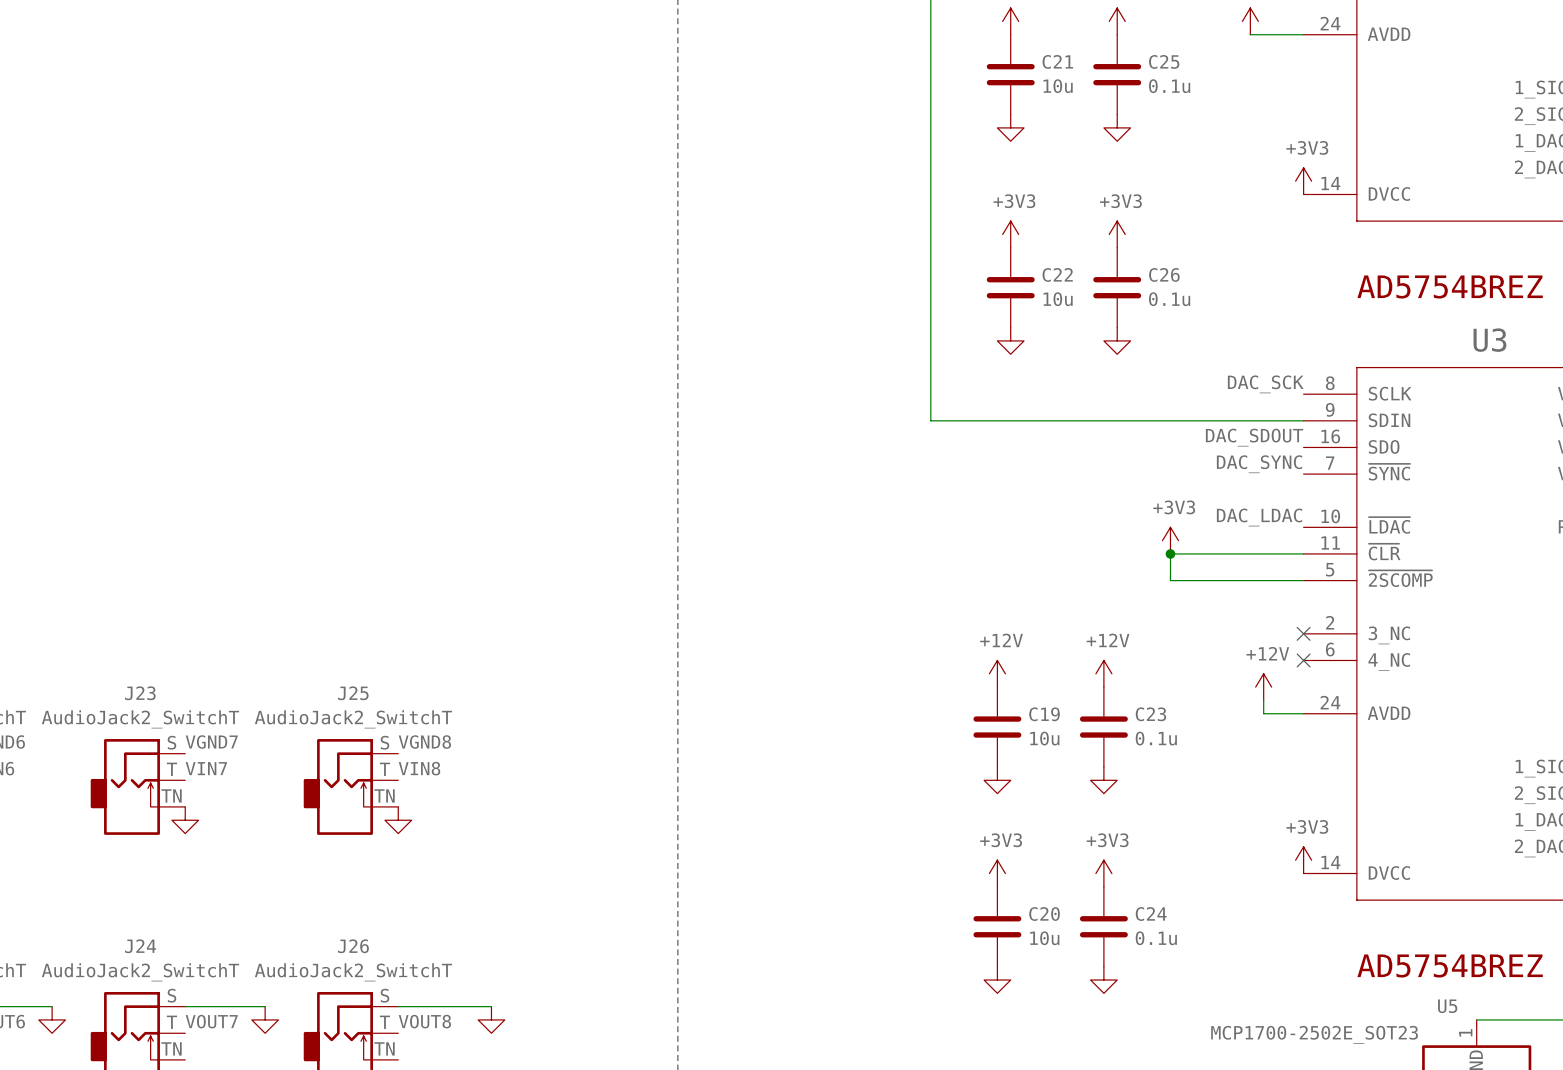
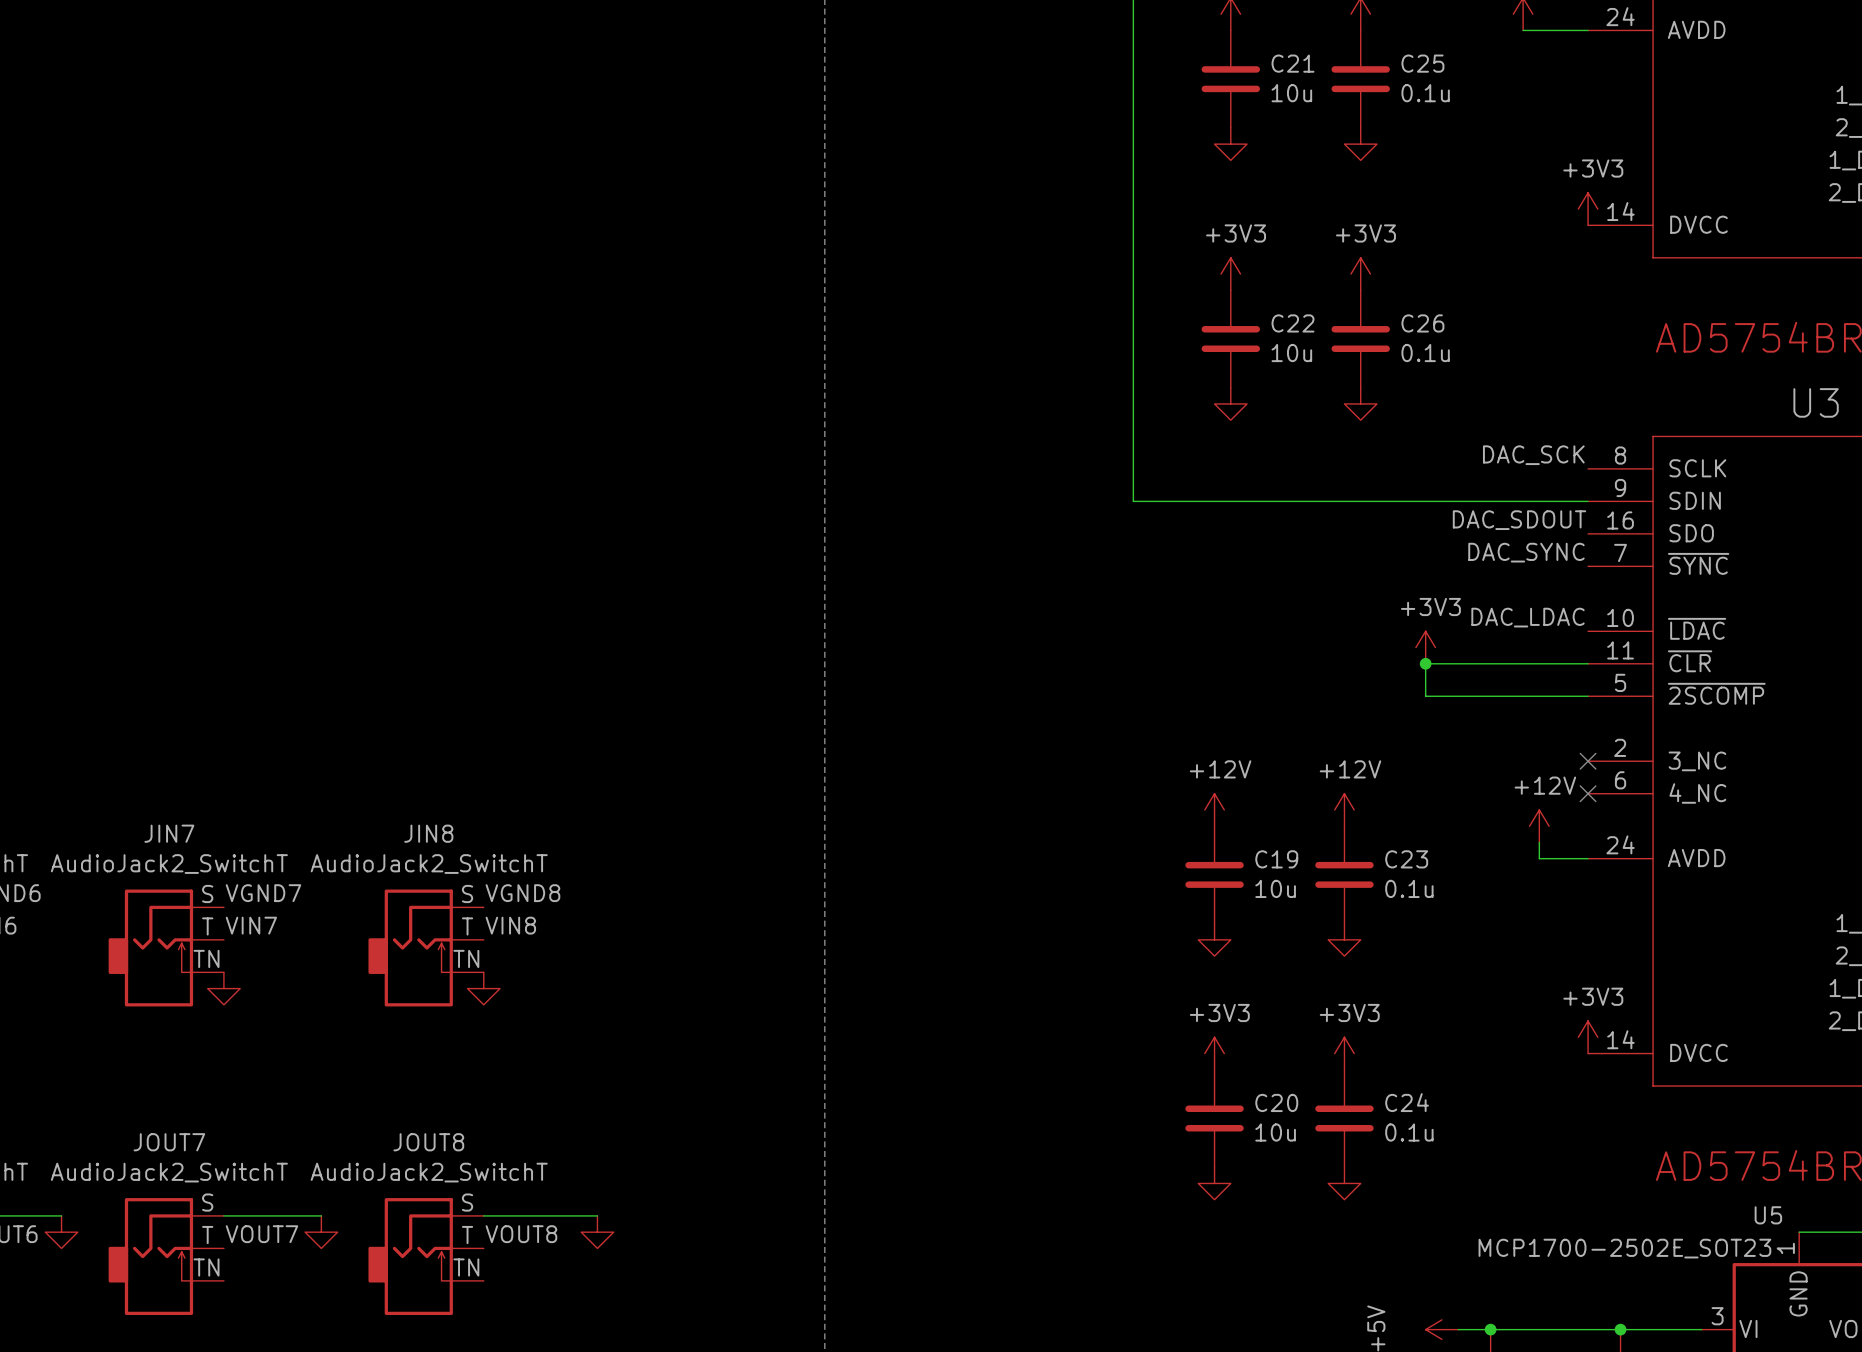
J23 name: J23 (140, 693) -> JIN7 (169, 833)
J25 name: J25 (353, 693) -> JIN8 (428, 833)
J24 name: J24 (140, 946) -> JOUT7 (169, 1142)
J26 name: J26 (353, 946) -> JOUT8 (428, 1142)

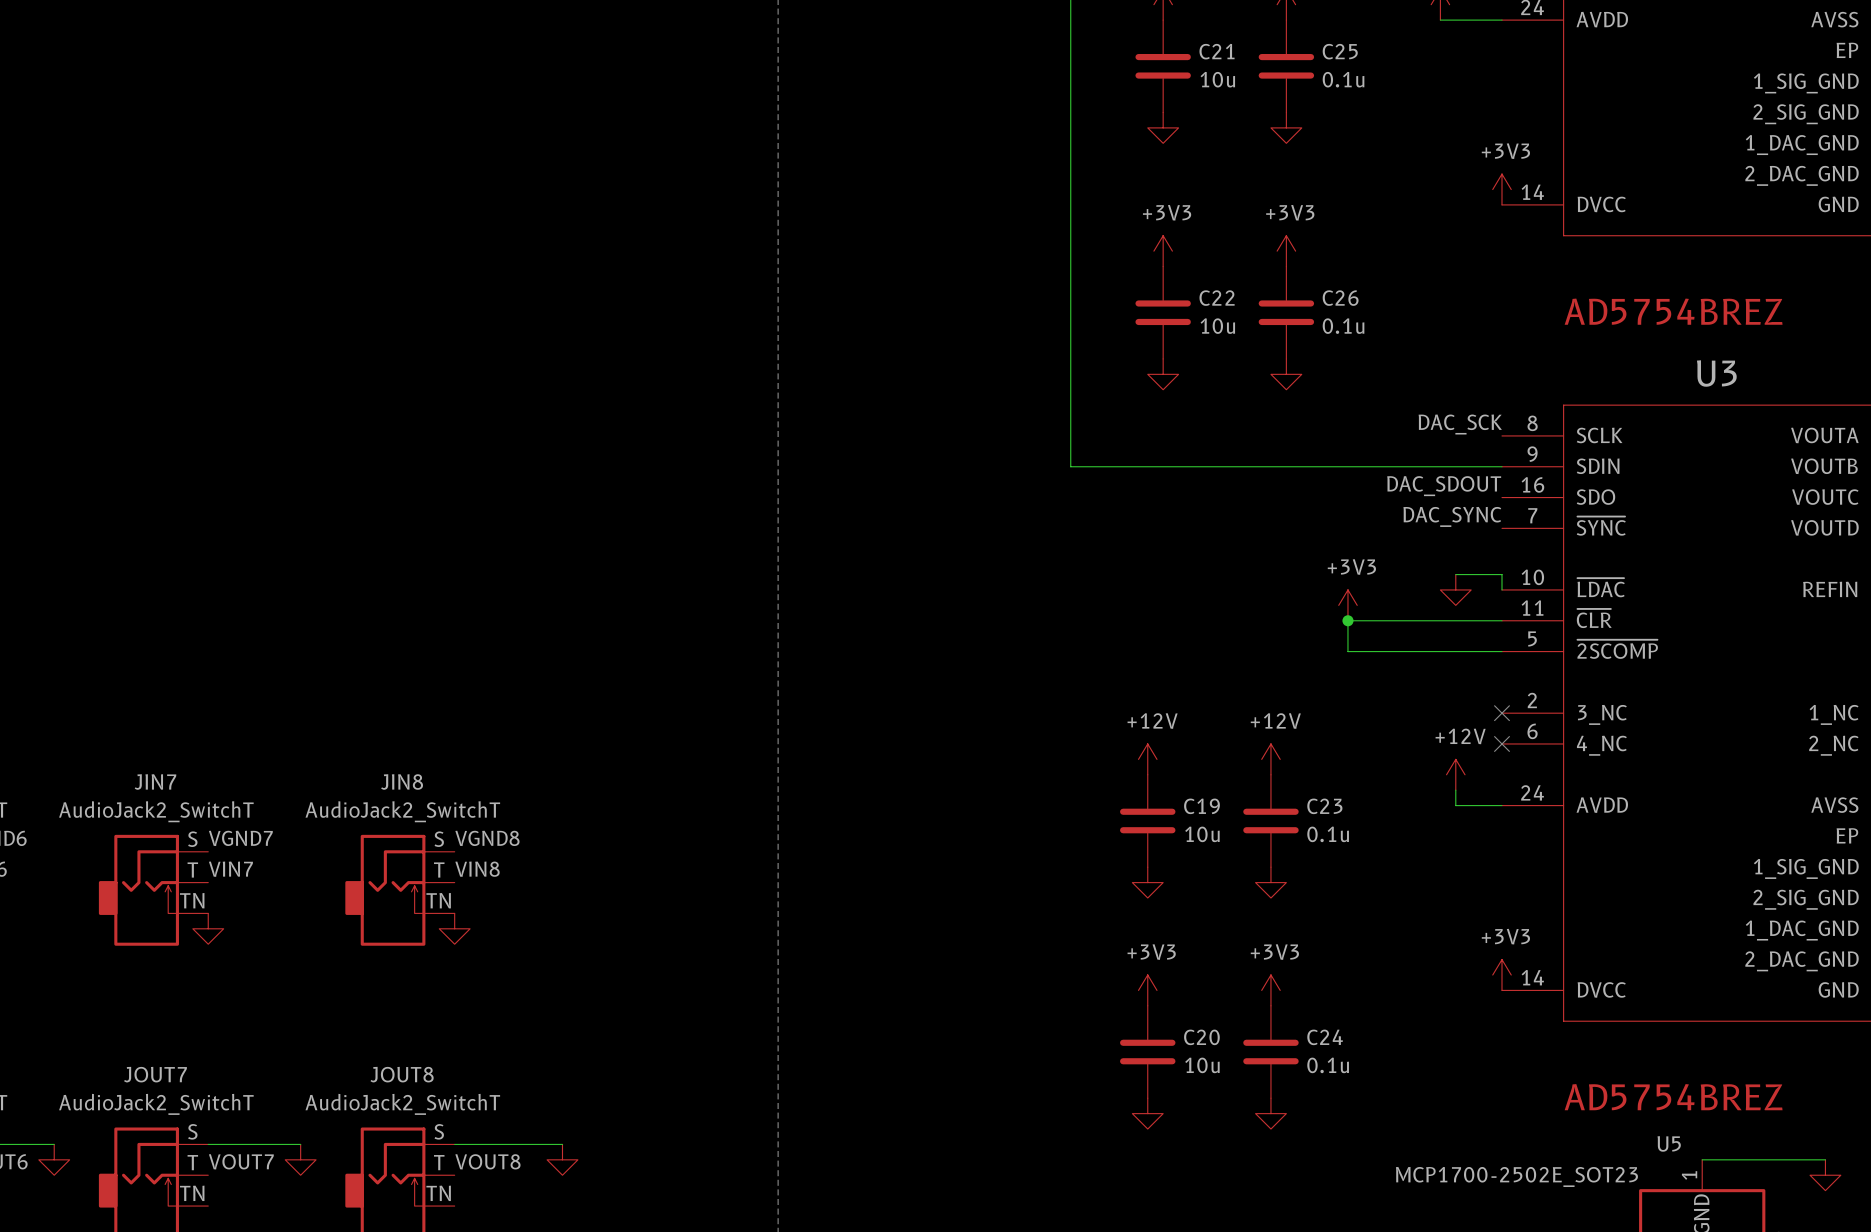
wire: none -> (1455, 574) (1501, 574) (1501, 589)
label: DAC_LDAC (1528, 617) -> none
power symbol: none -> (1455, 589)

